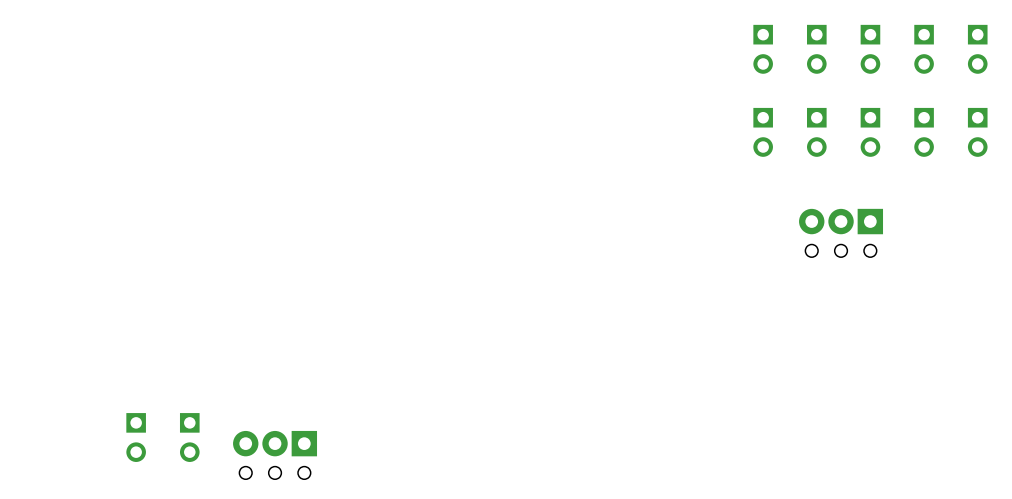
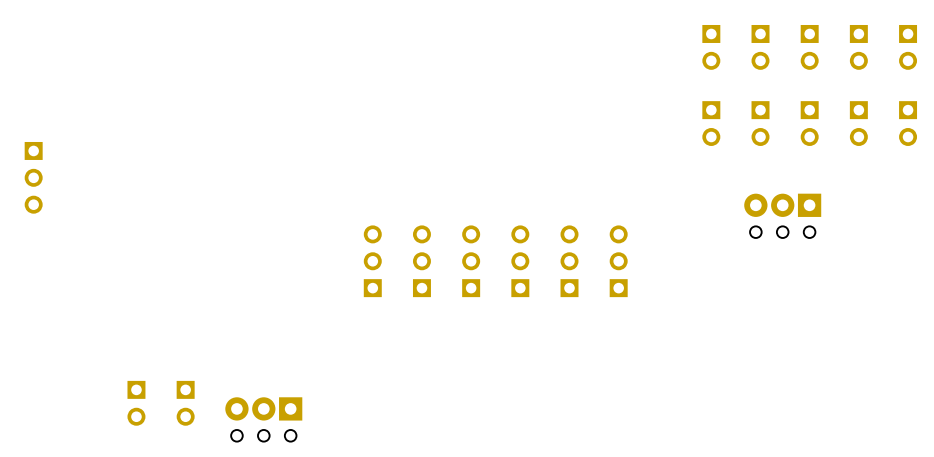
part: none -> (33, 177)
part: none -> (372, 261)
part: none -> (421, 261)
part: none -> (471, 261)
part: none -> (520, 261)
part: none -> (569, 261)
part: none -> (618, 261)

